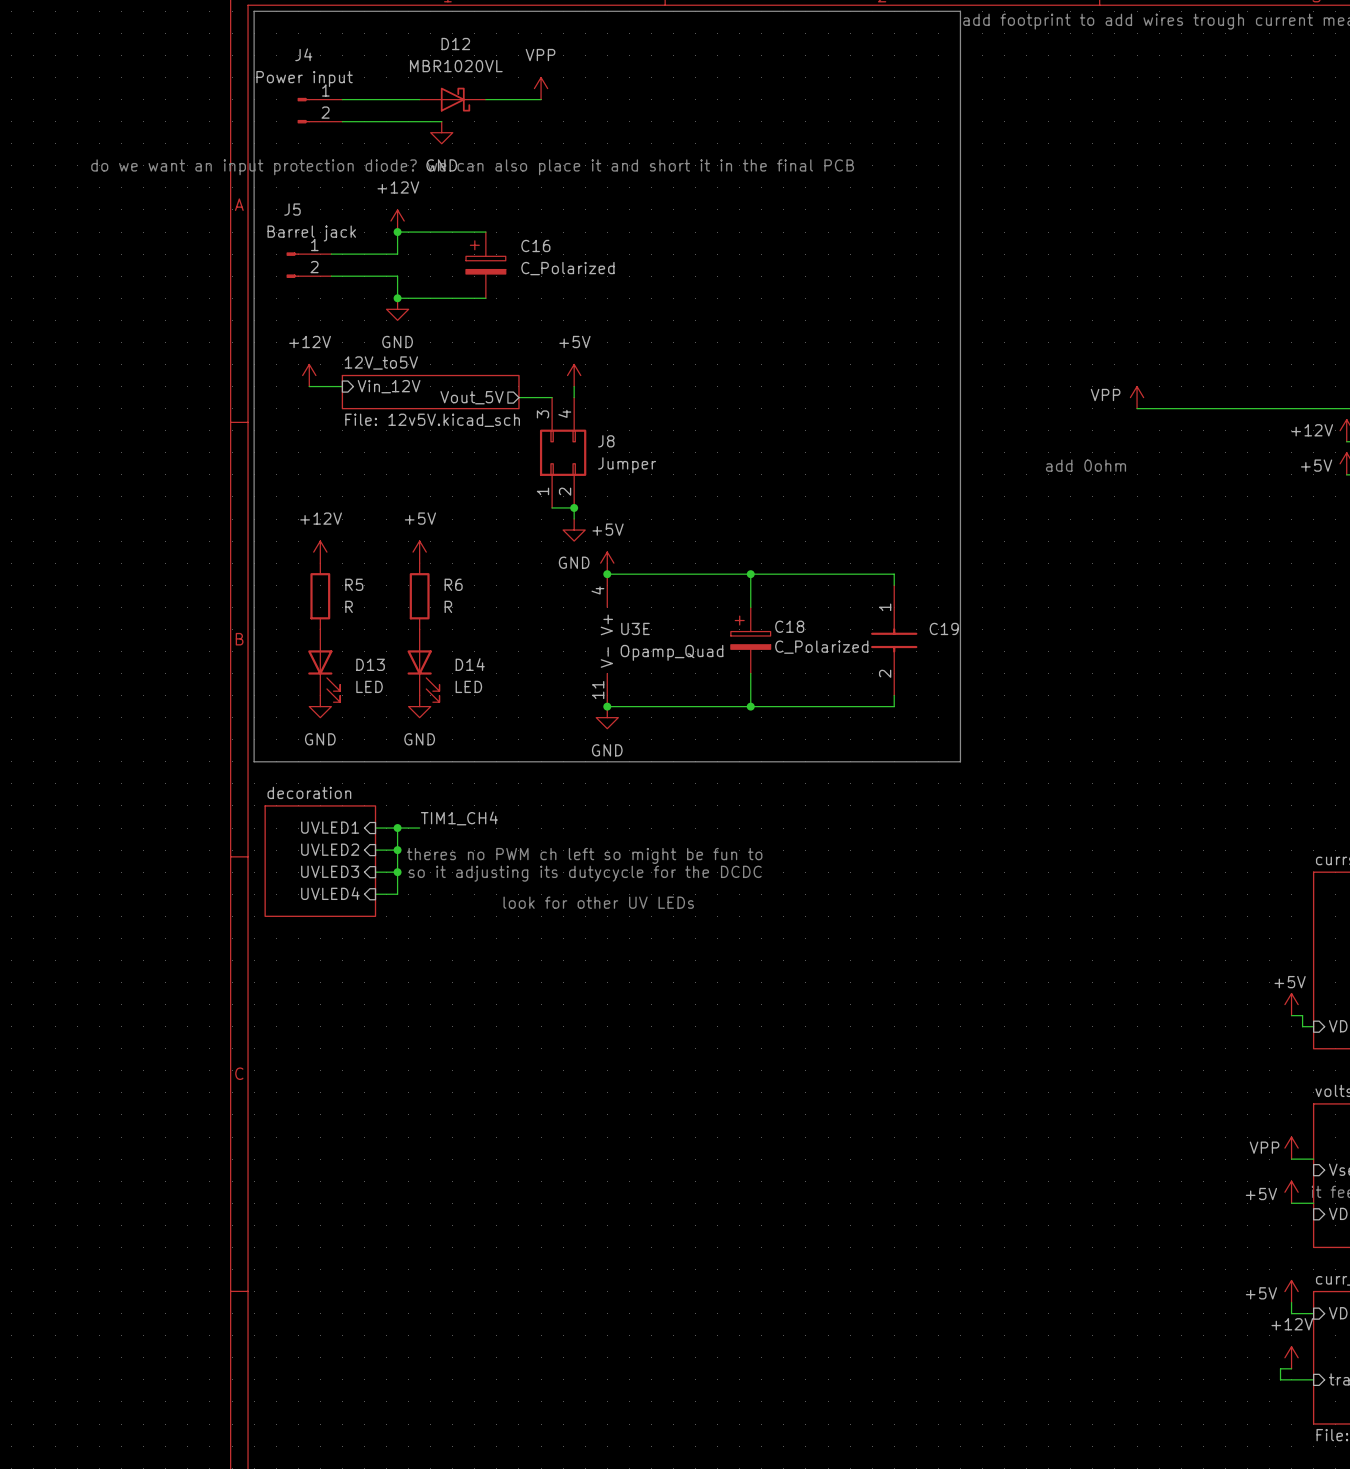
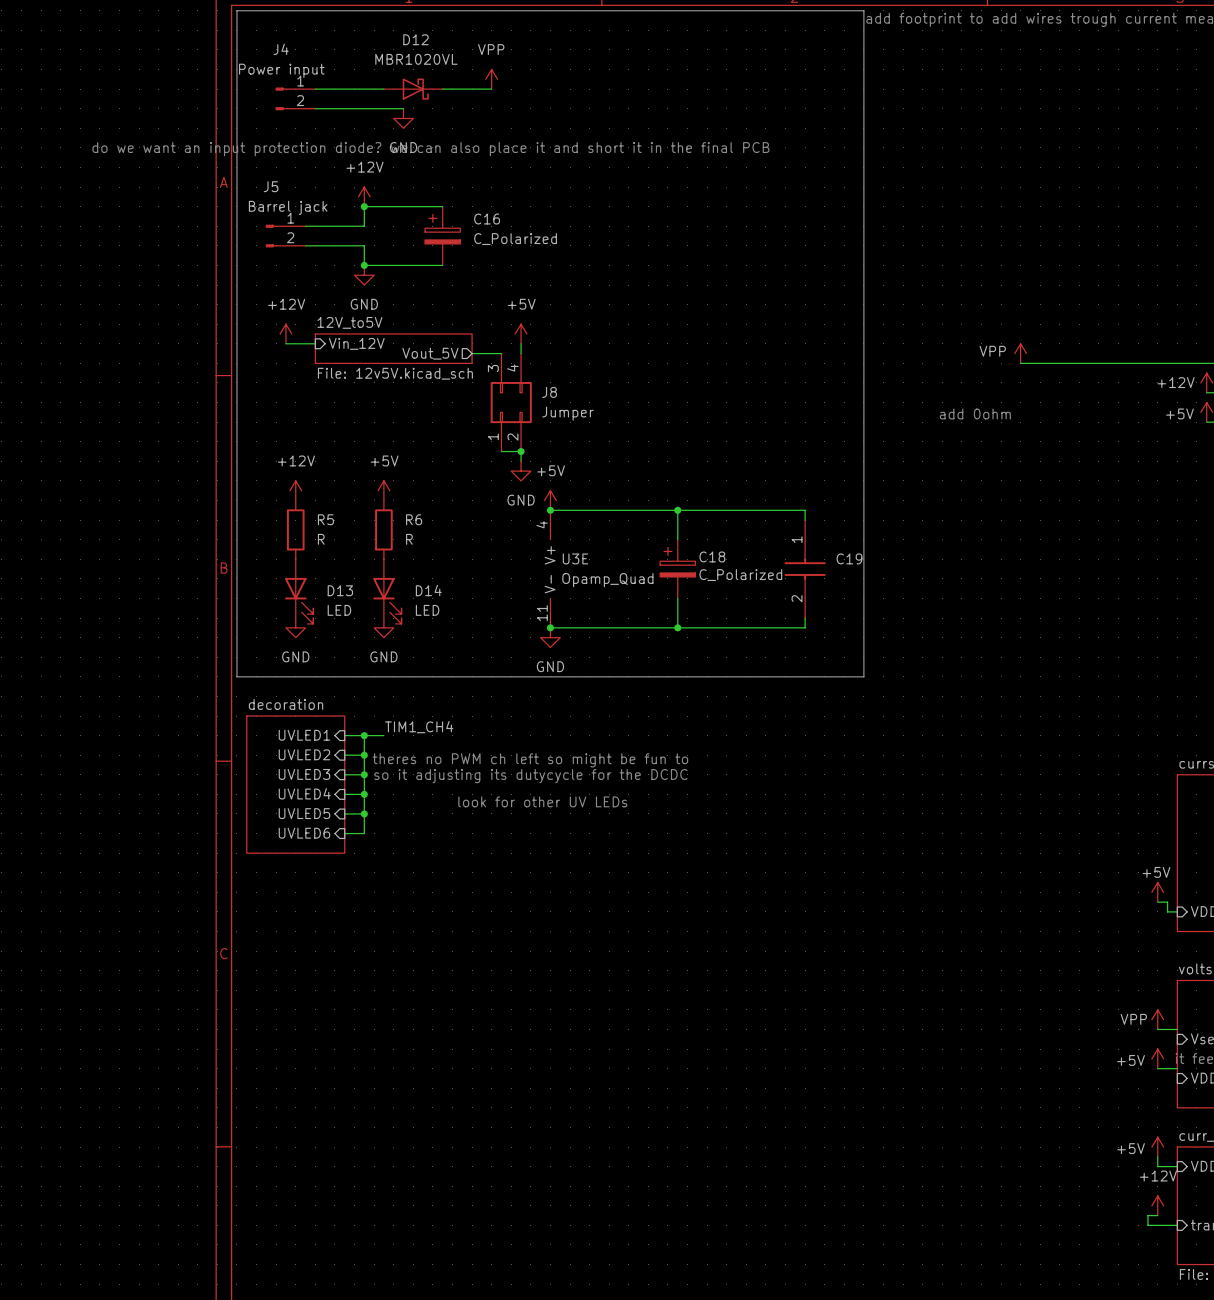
sheet decoration: (320, 861) -> none
sheet decoration: none -> (295, 784)
wire: none -> (364, 794) (364, 833) (344, 833)
junction: none -> (364, 794)
sheet pin: none -> UVLED5 (304, 813)
wire: none -> (344, 813) (364, 813)
junction: none -> (364, 813)
sheet pin: none -> UVLED6 (304, 833)

